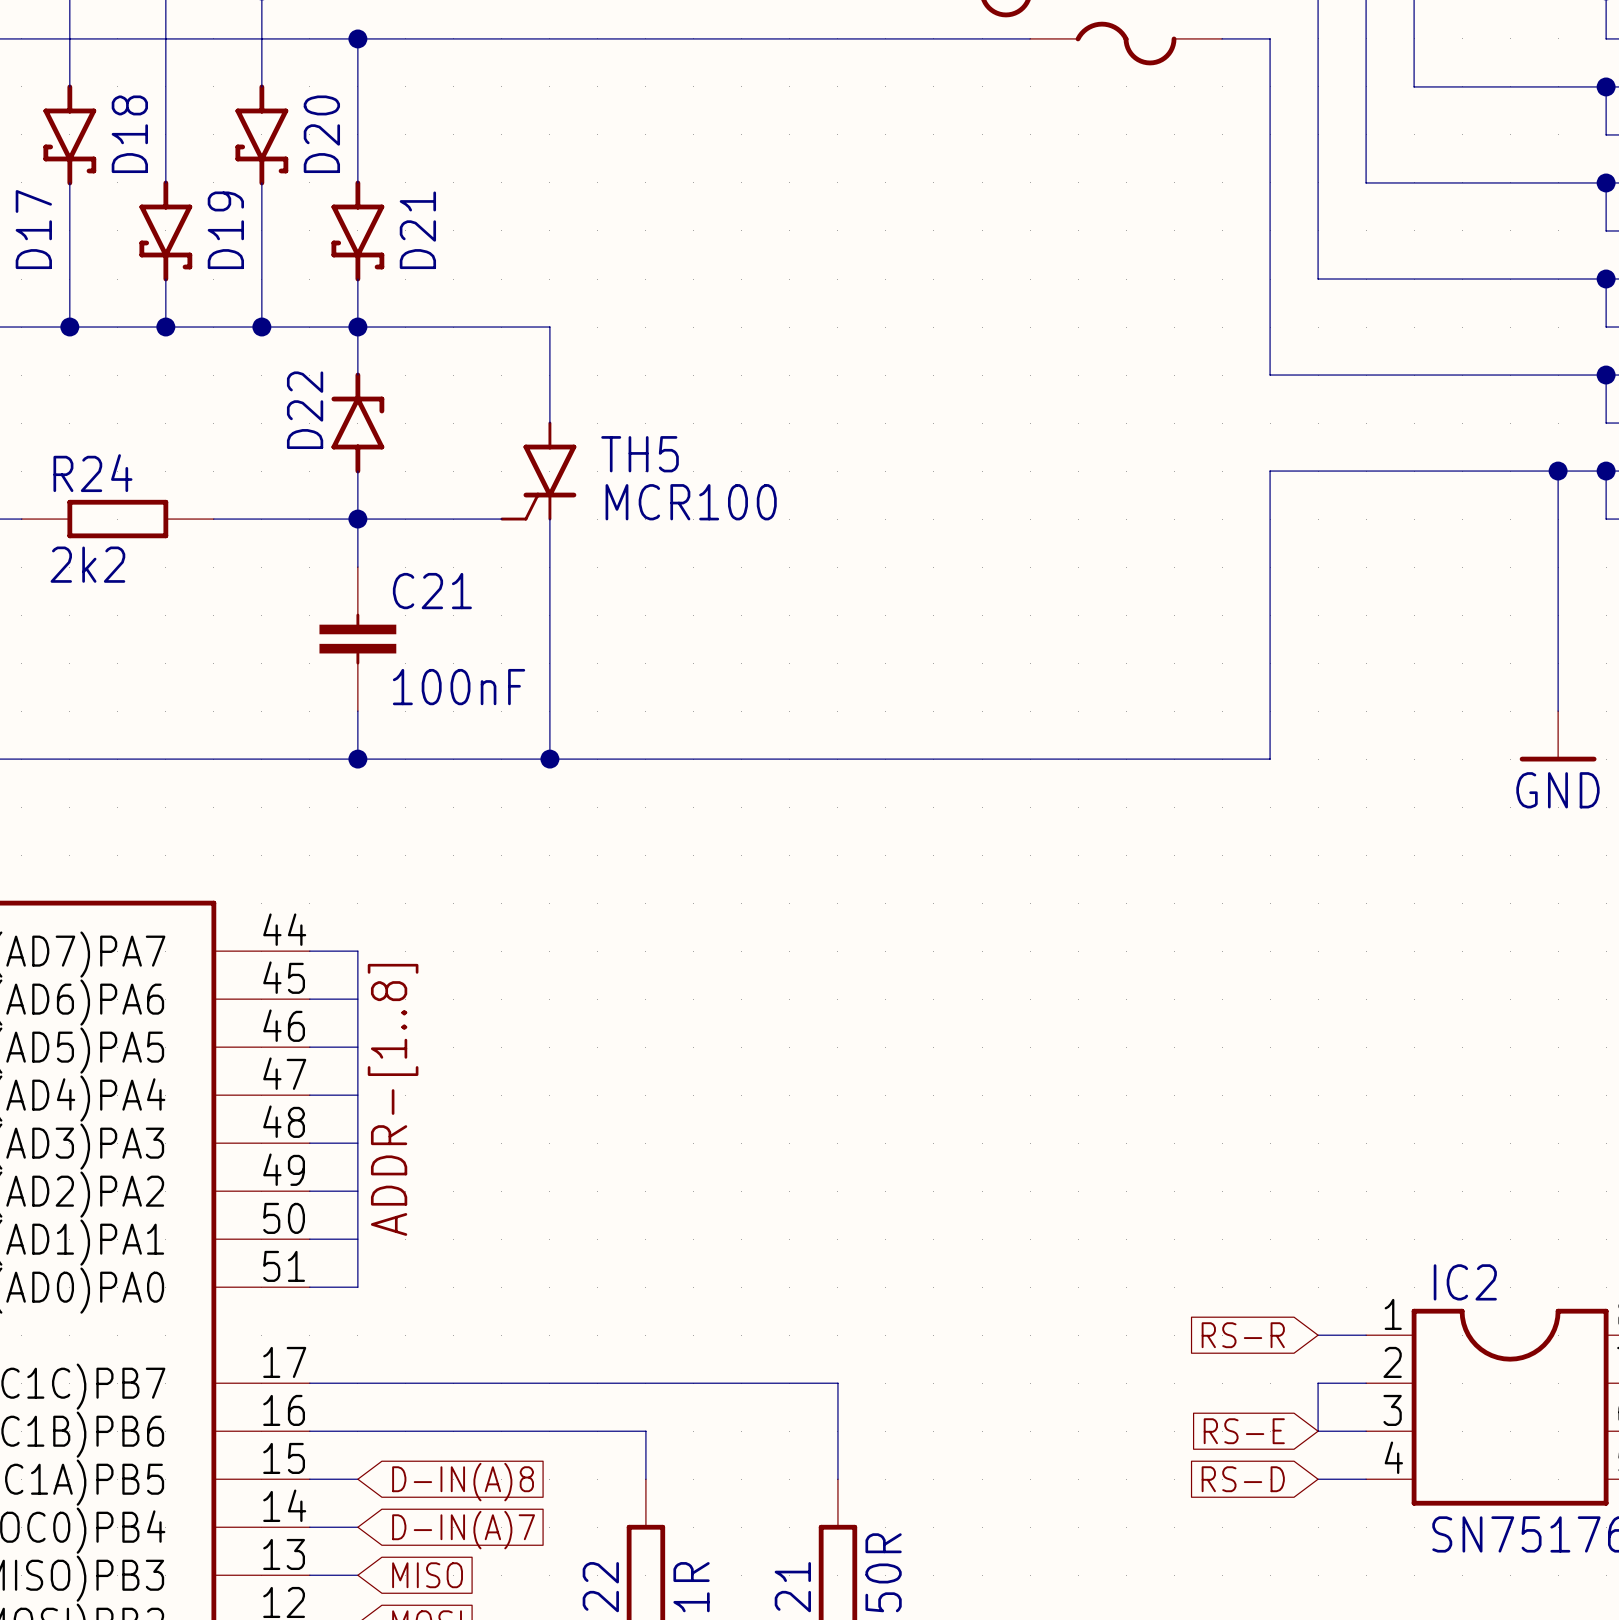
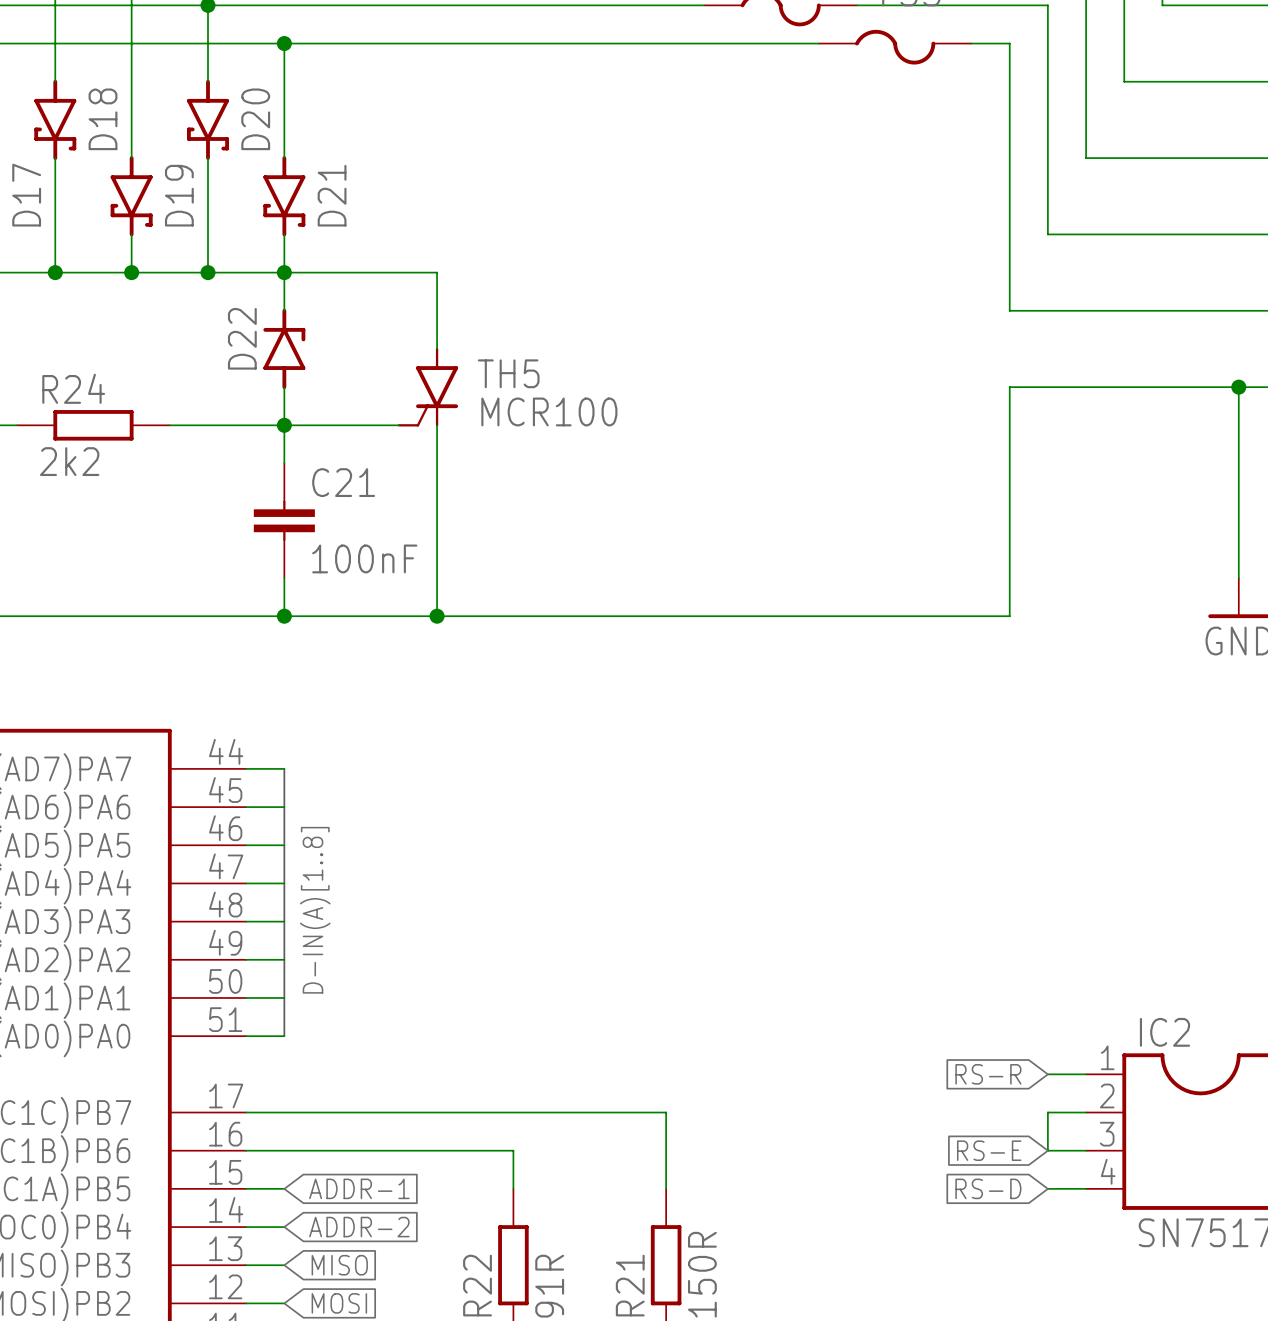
label: ADDR-[1..8] (393, 1099) -> D-IN(A)[1..8] (315, 910)
global label: D-IN(A)8 (463, 1482) -> ADDR-1 (359, 1188)
global label: D-IN(A)7 (463, 1530) -> ADDR-2 (359, 1227)

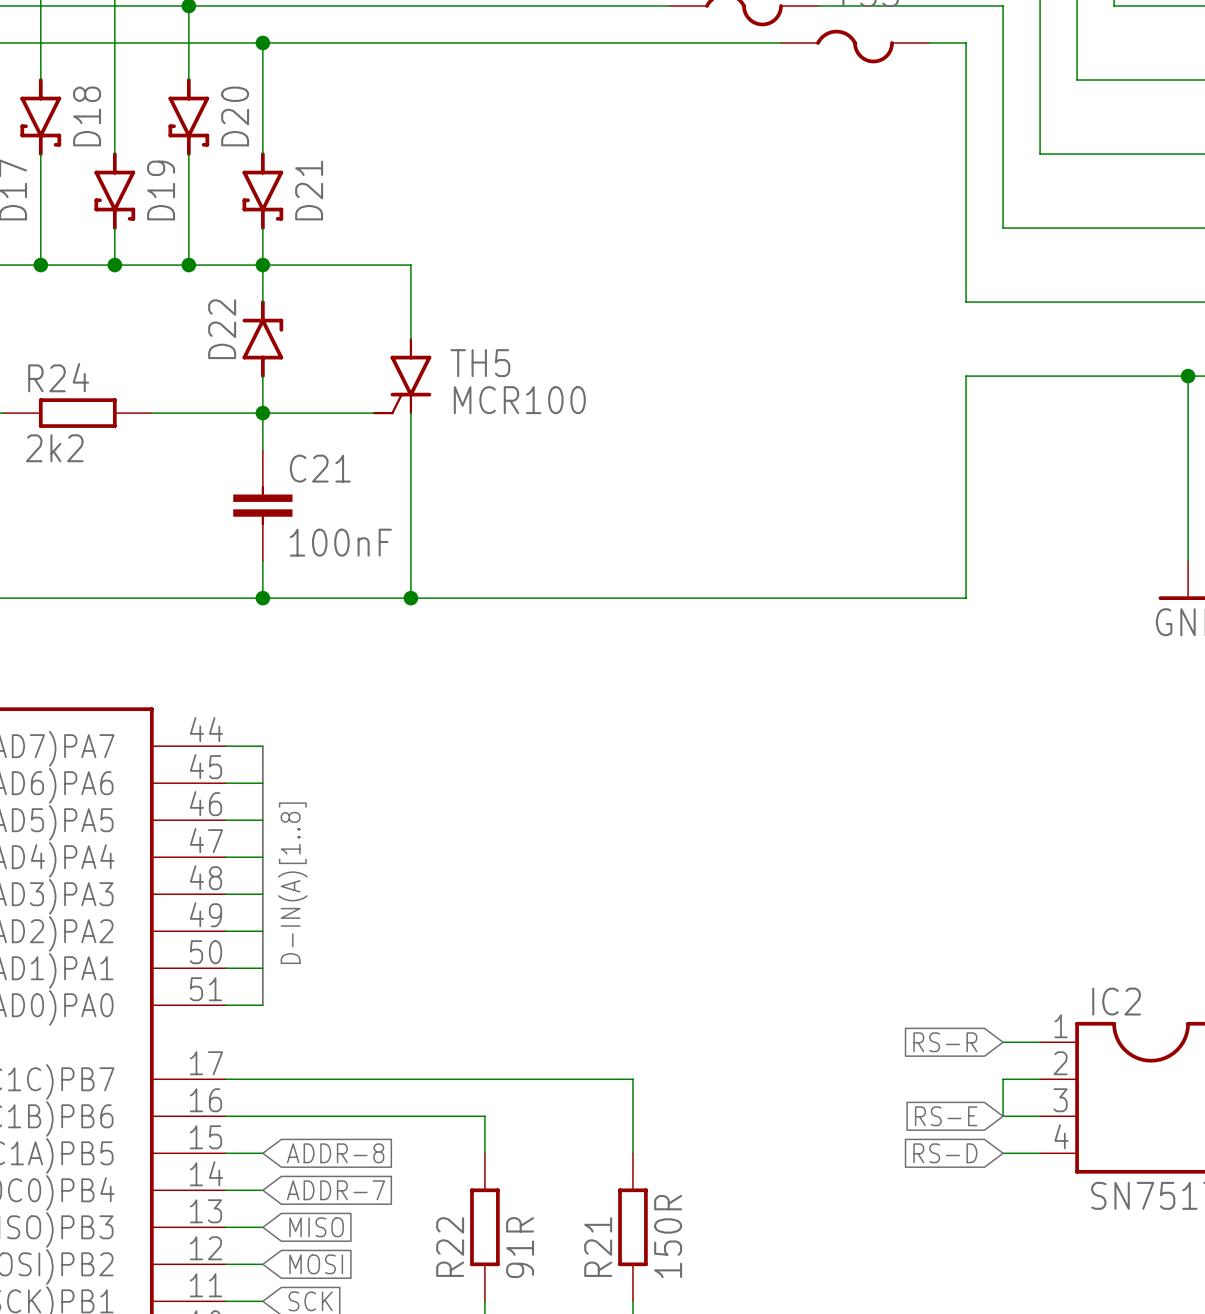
global label: ADDR-1 (359, 1188) -> ADDR-8 (335, 1153)
global label: ADDR-2 (359, 1227) -> ADDR-7 (336, 1190)

